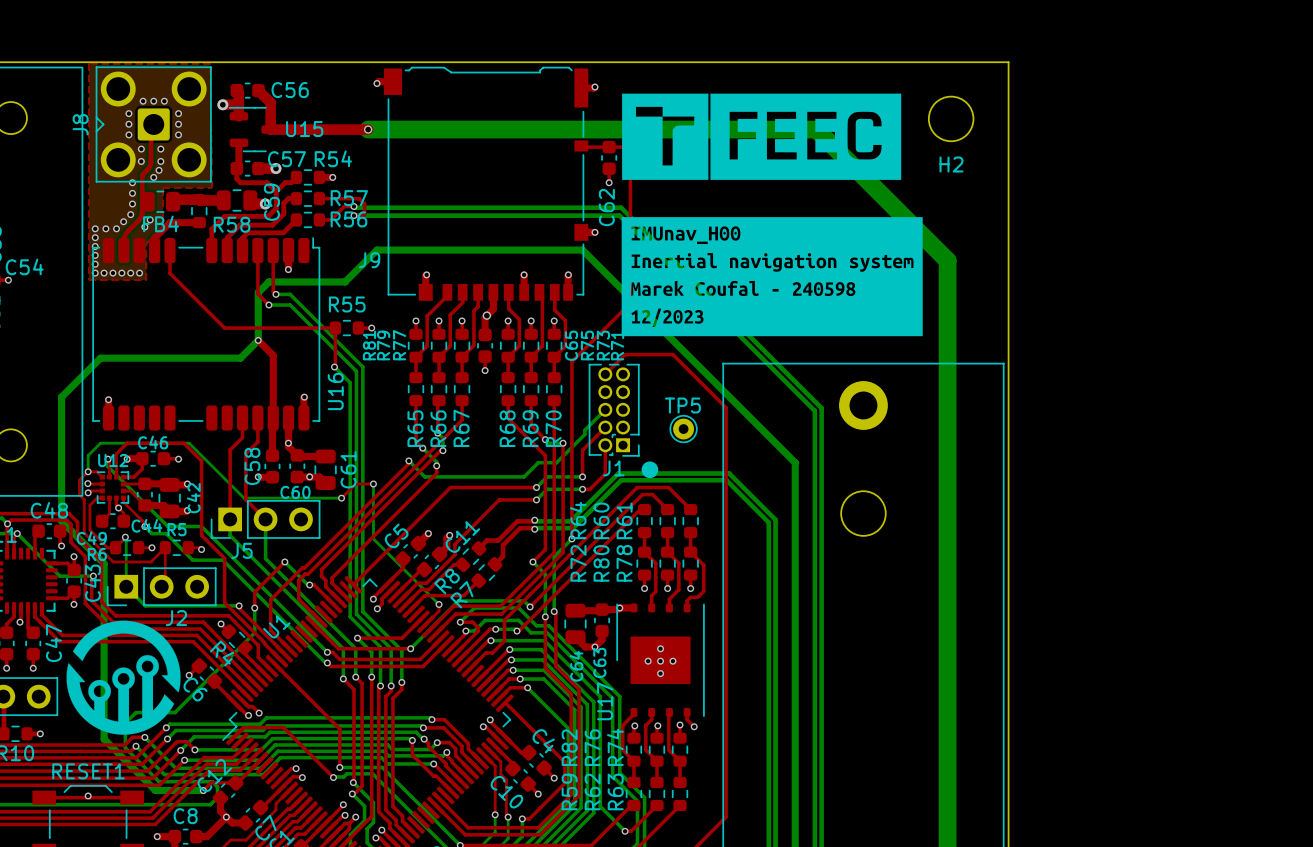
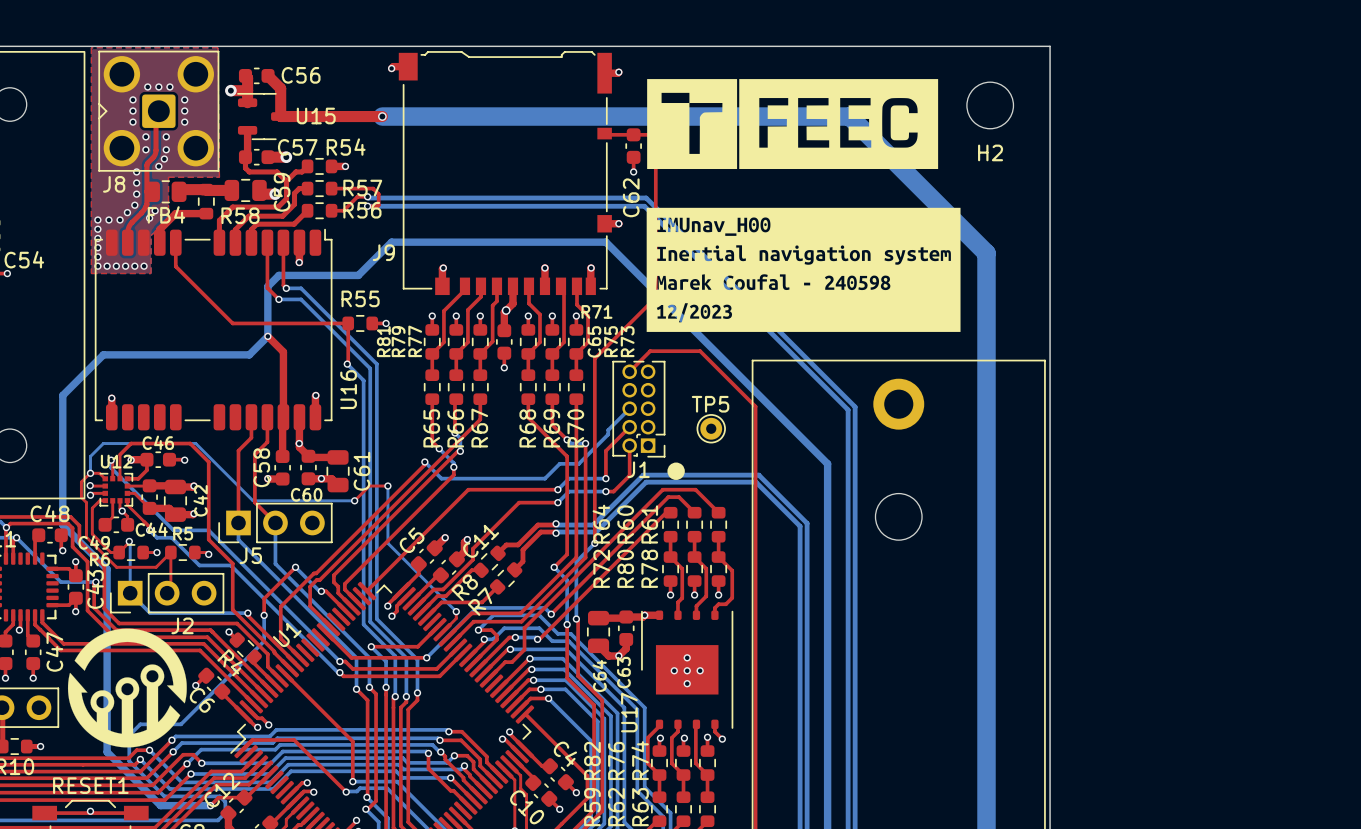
J8 name rotation: 0° (80, 124) -> 90° clockwise (114, 184)
J8 name position: J8 (80, 124) -> J8 (114, 184)
R71 name rotation: 0° (617, 345) -> 90° clockwise (596, 311)
R71 name position: R71 (617, 345) -> R71 (596, 311)

